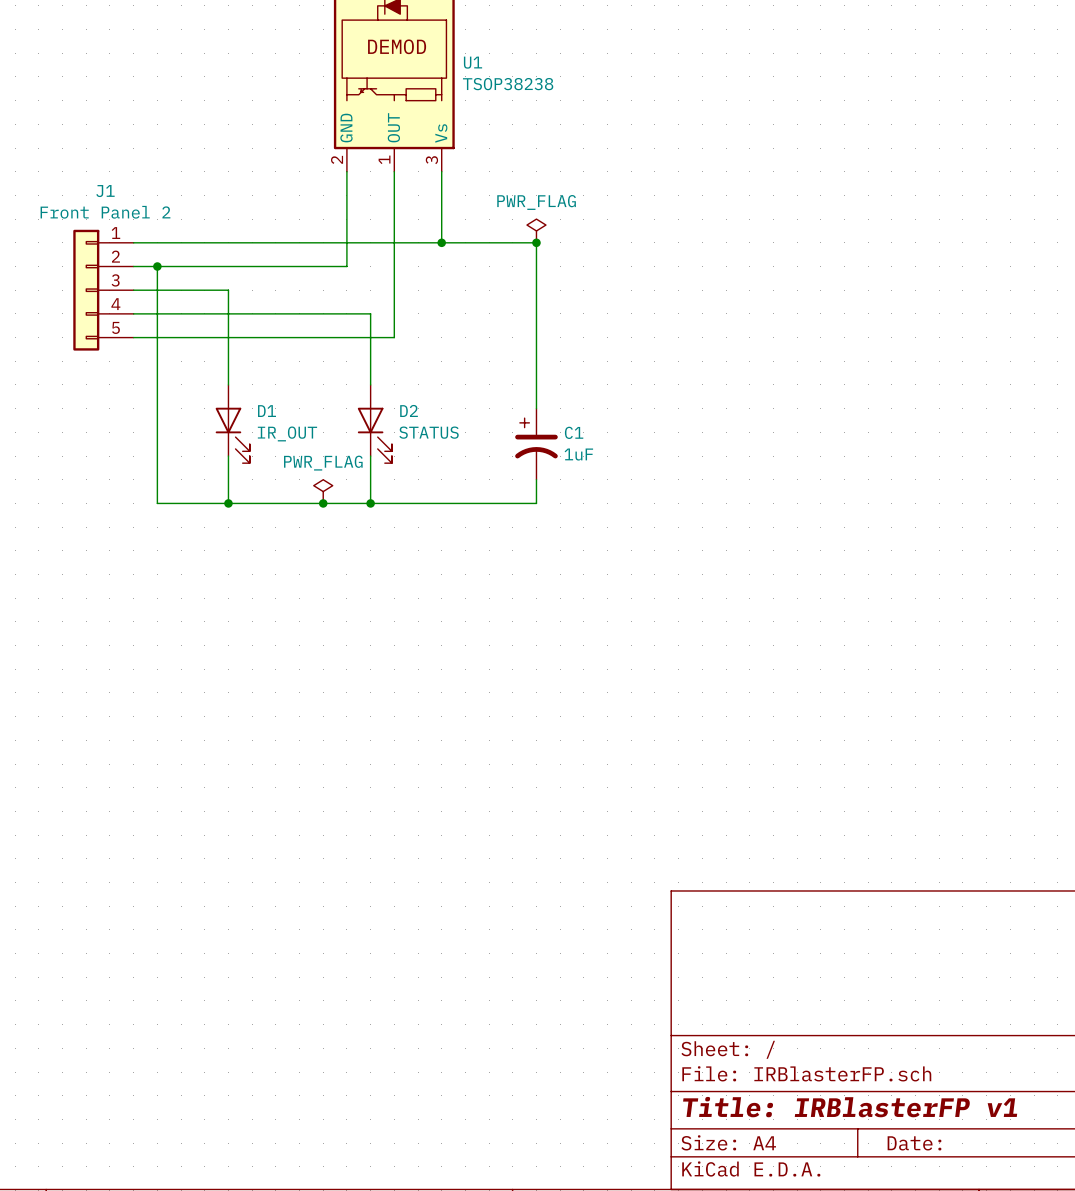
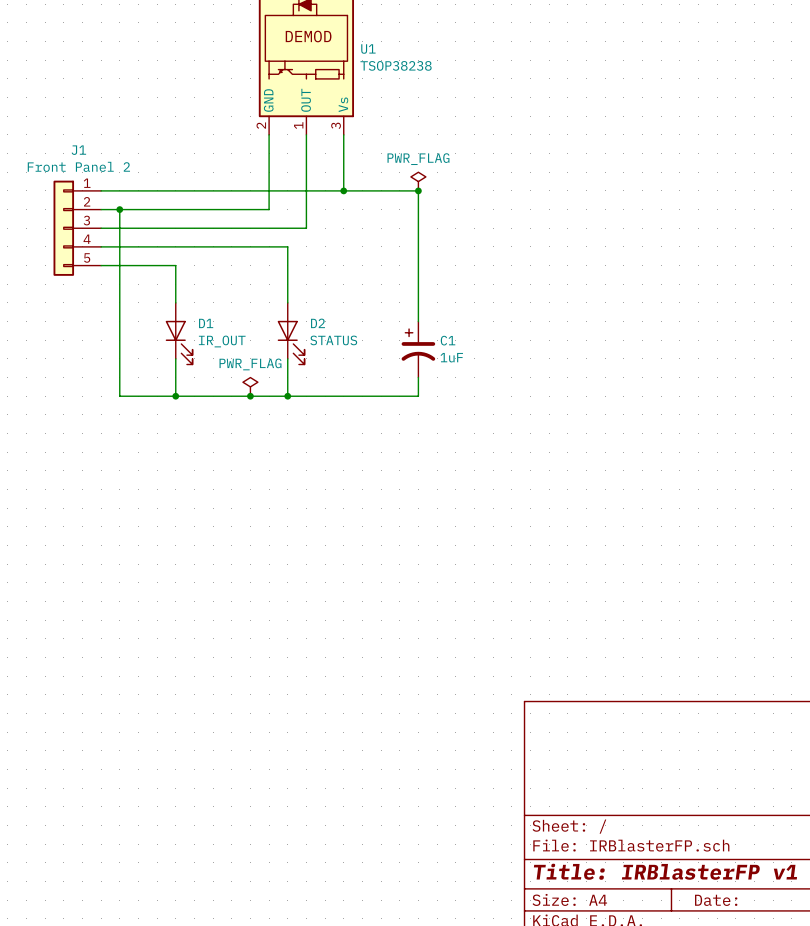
wire: (228, 290) (228, 337) (394, 337) (394, 290) -> (175, 228) (306, 228)

